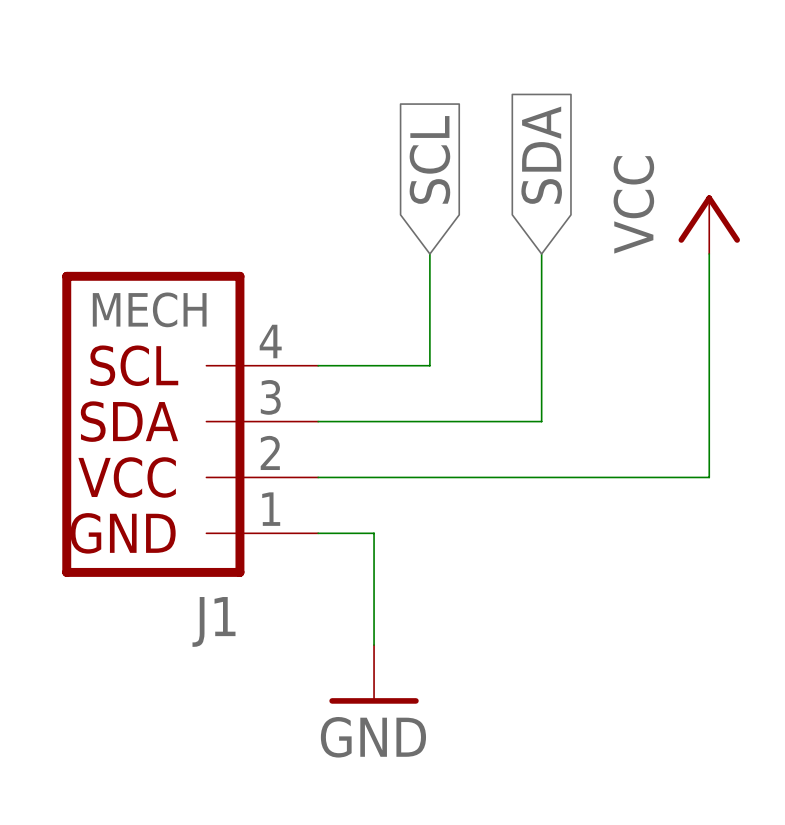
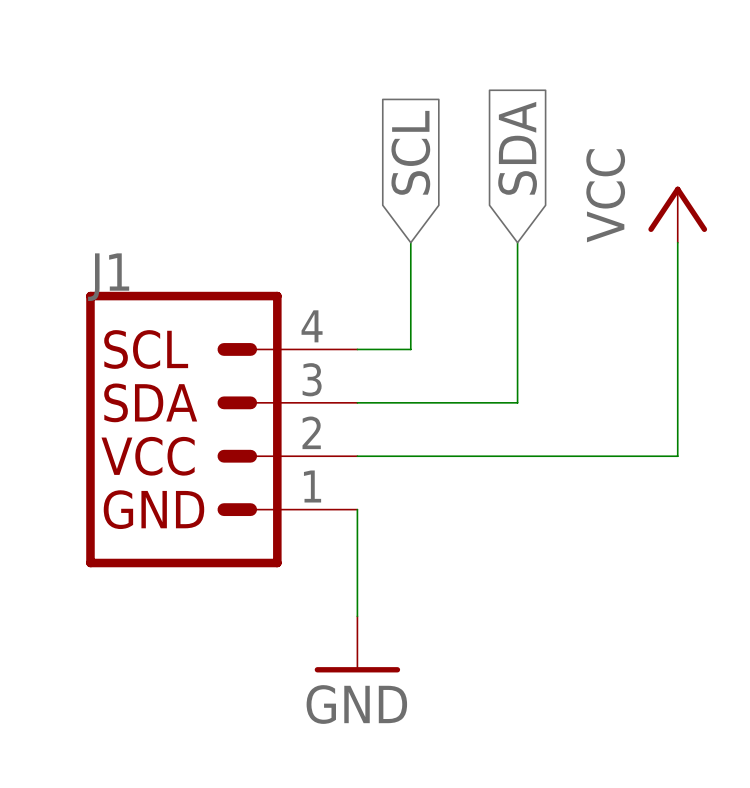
J1 symbol: [62, 271, 319, 577] -> [86, 291, 358, 568]
J1 name position: J1 (213, 621) -> J1 (108, 277)

